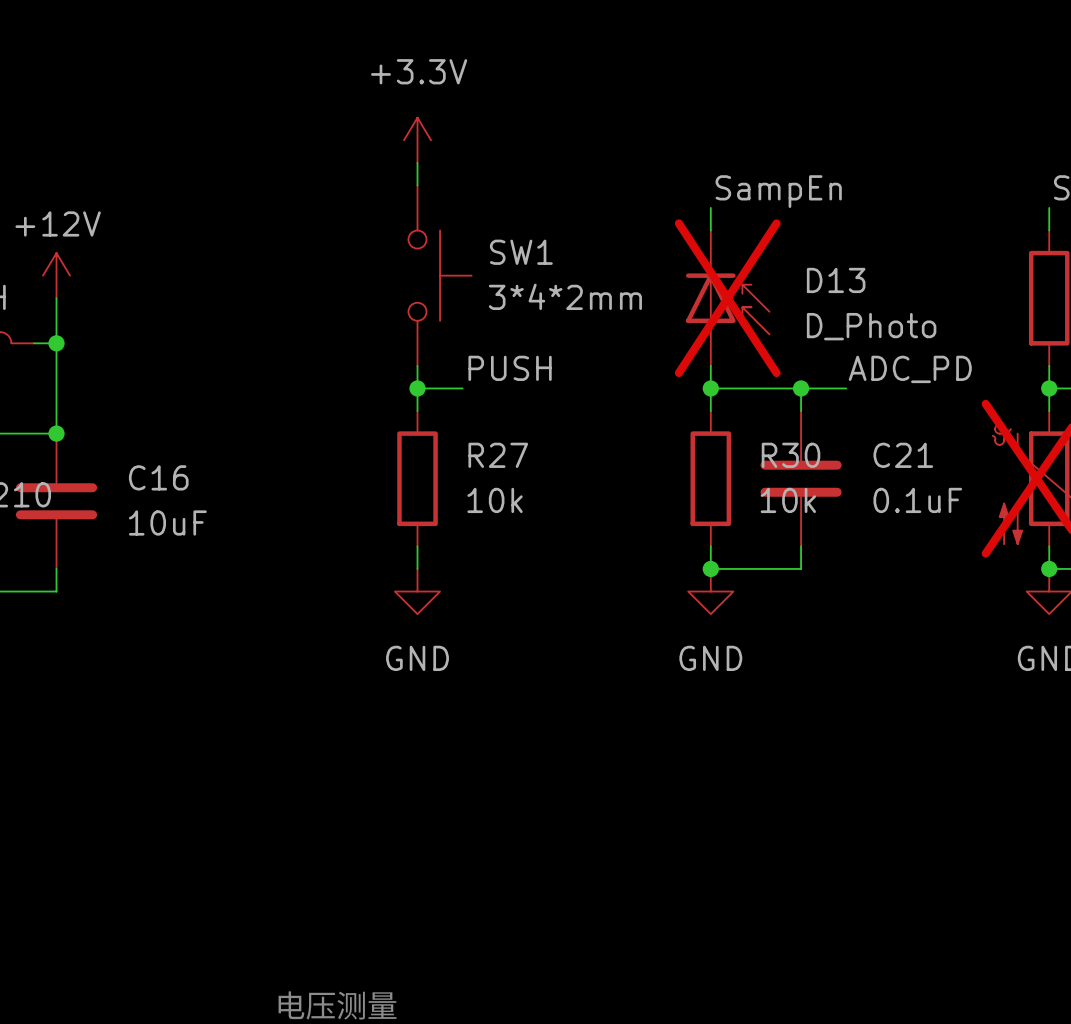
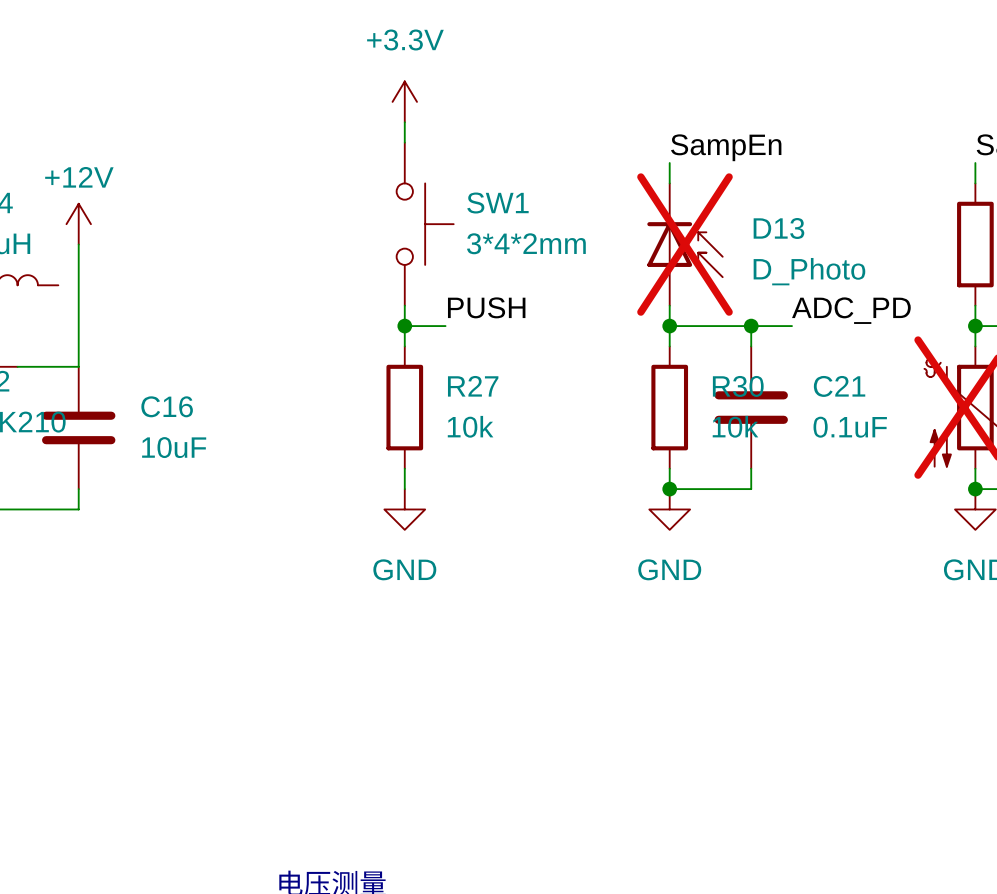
wire: (33, 343) (56, 343) -> none
junction: (56, 343) -> none
junction: (56, 433) -> none

